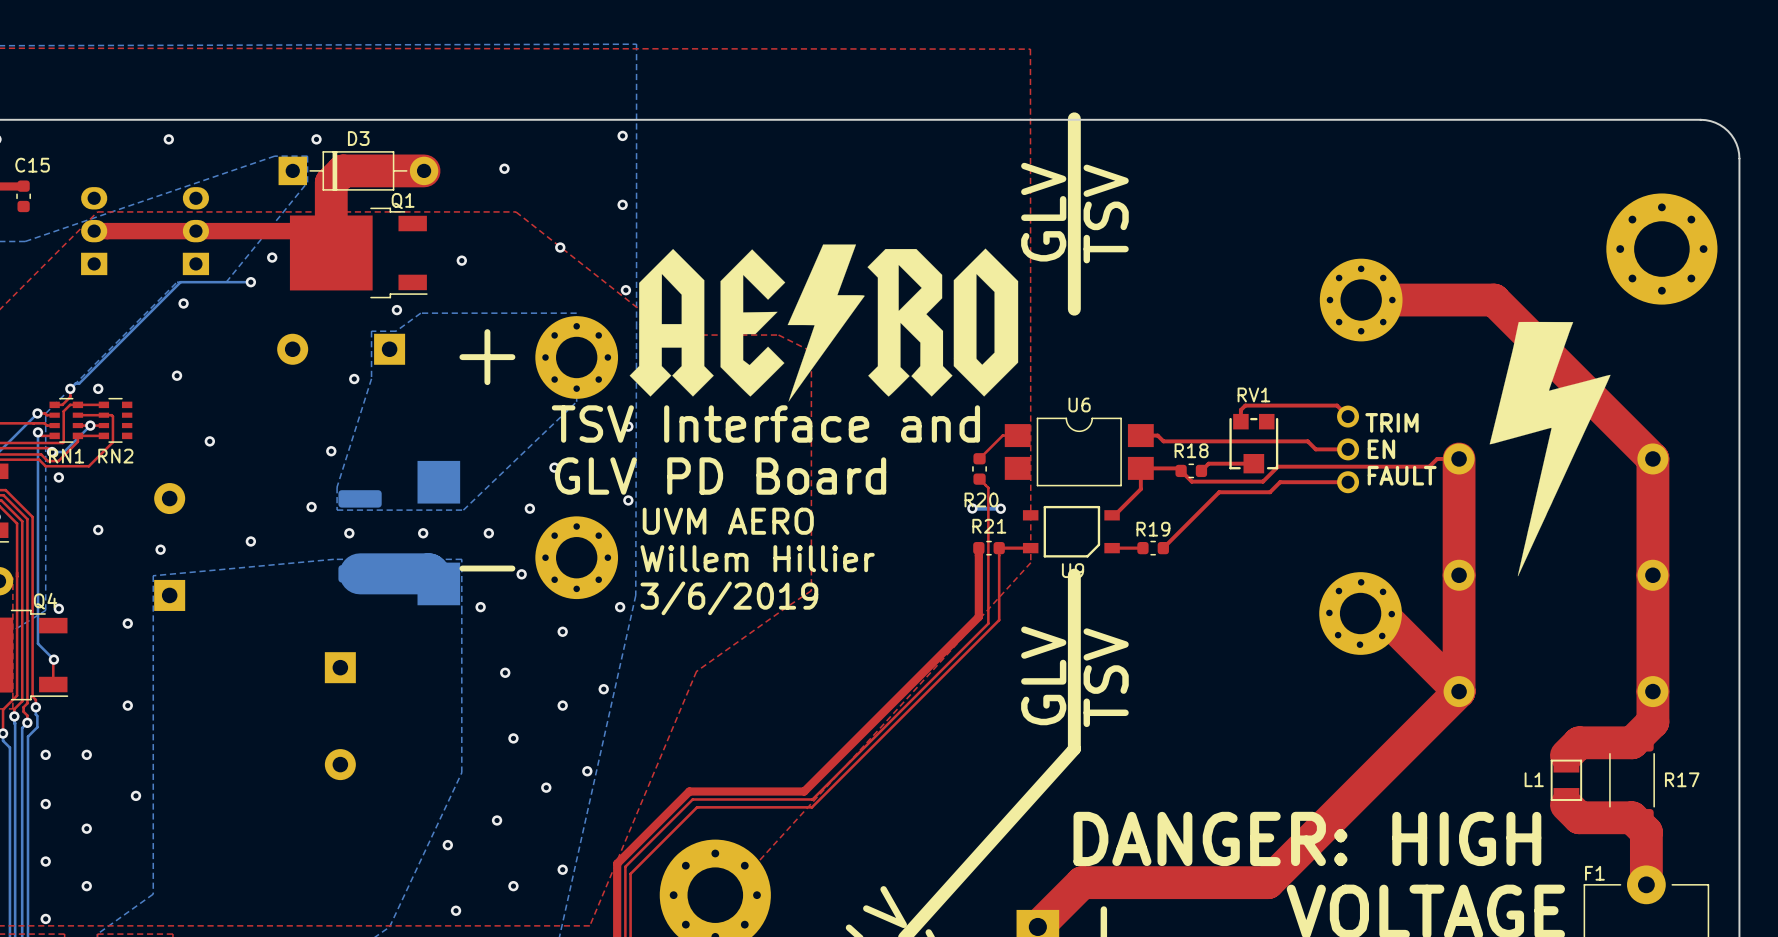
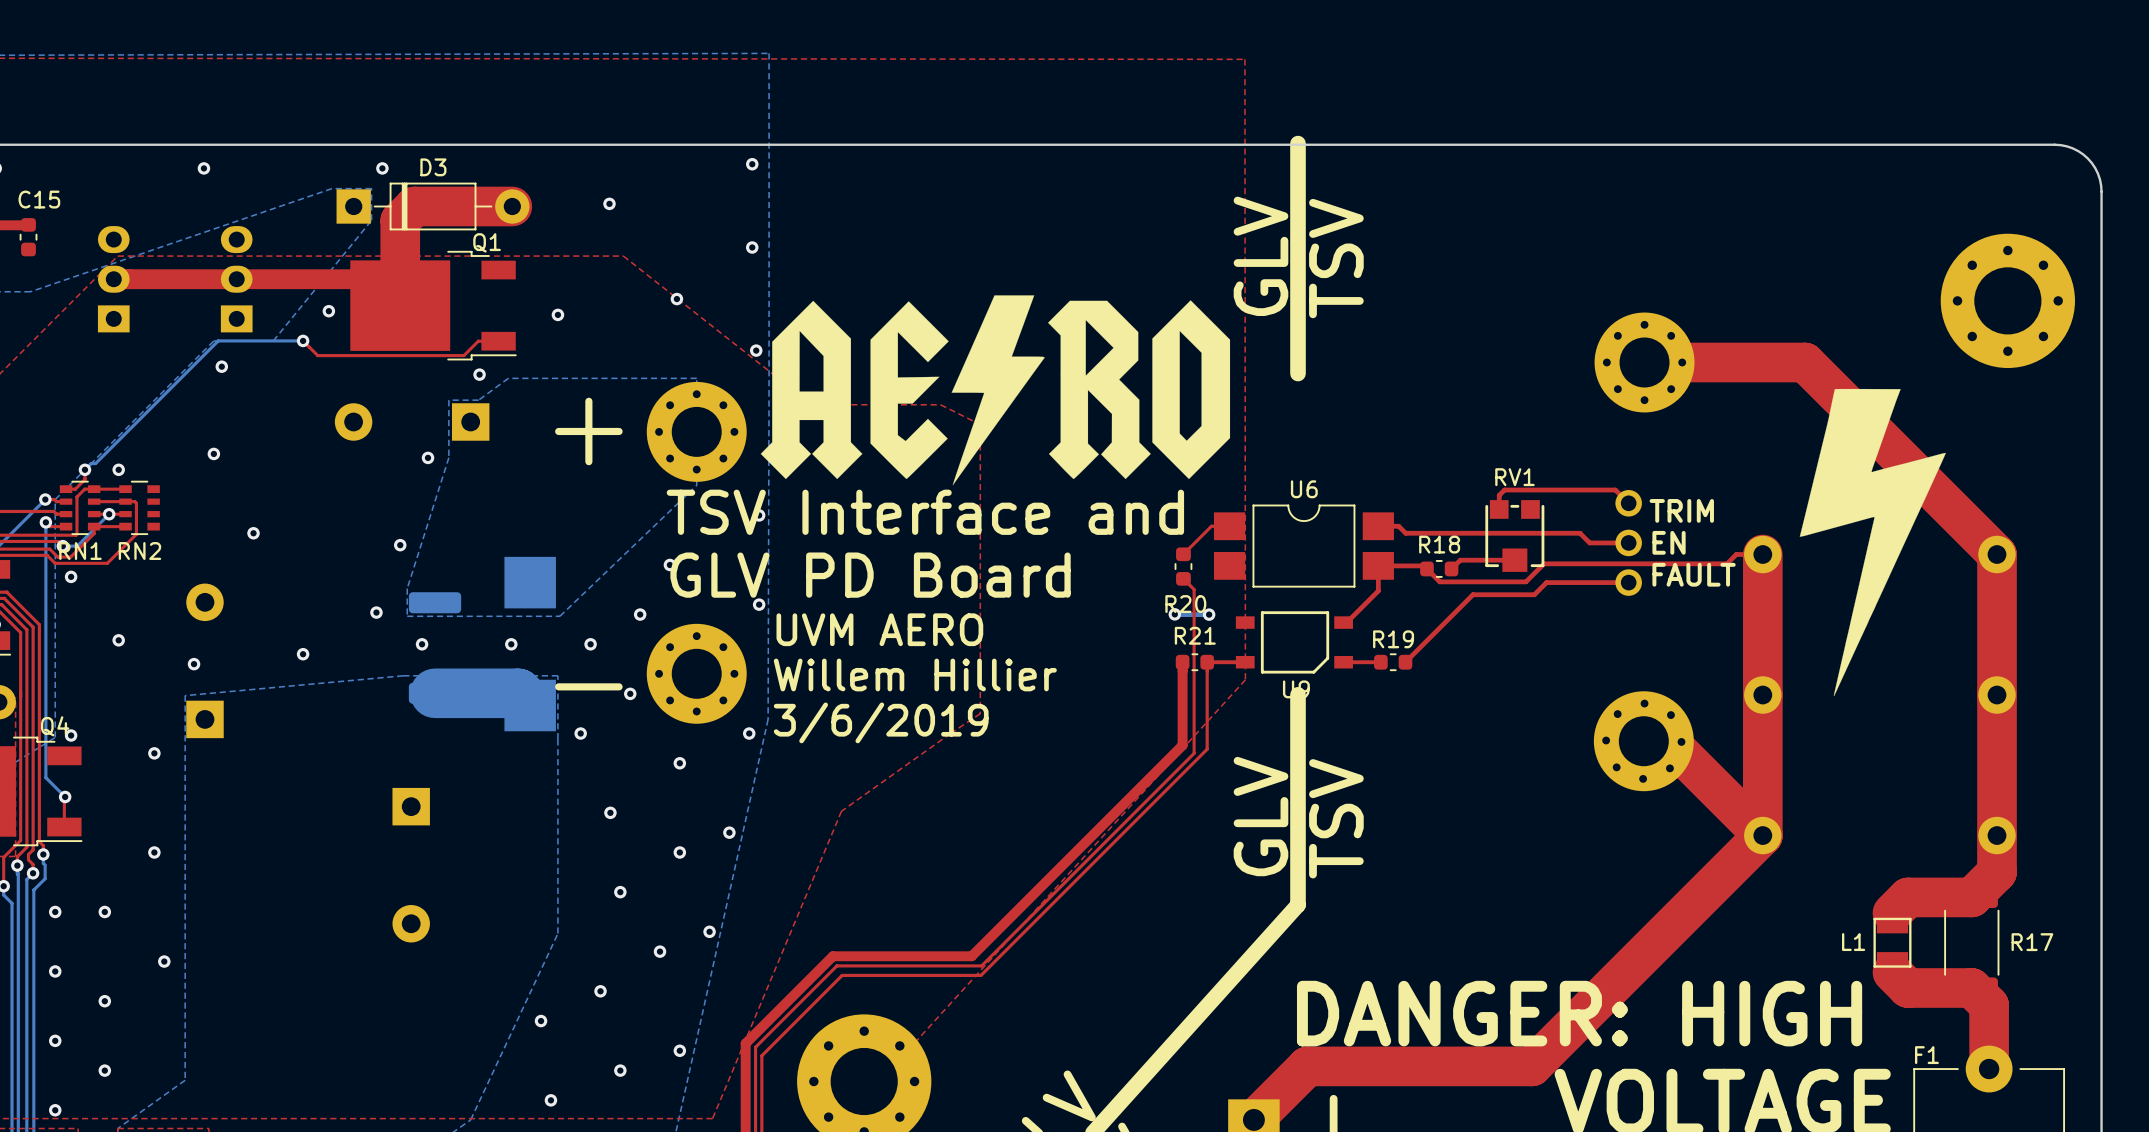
top track: none -> (303, 340) (317, 355) (463, 355) (478, 341) (498, 341)

